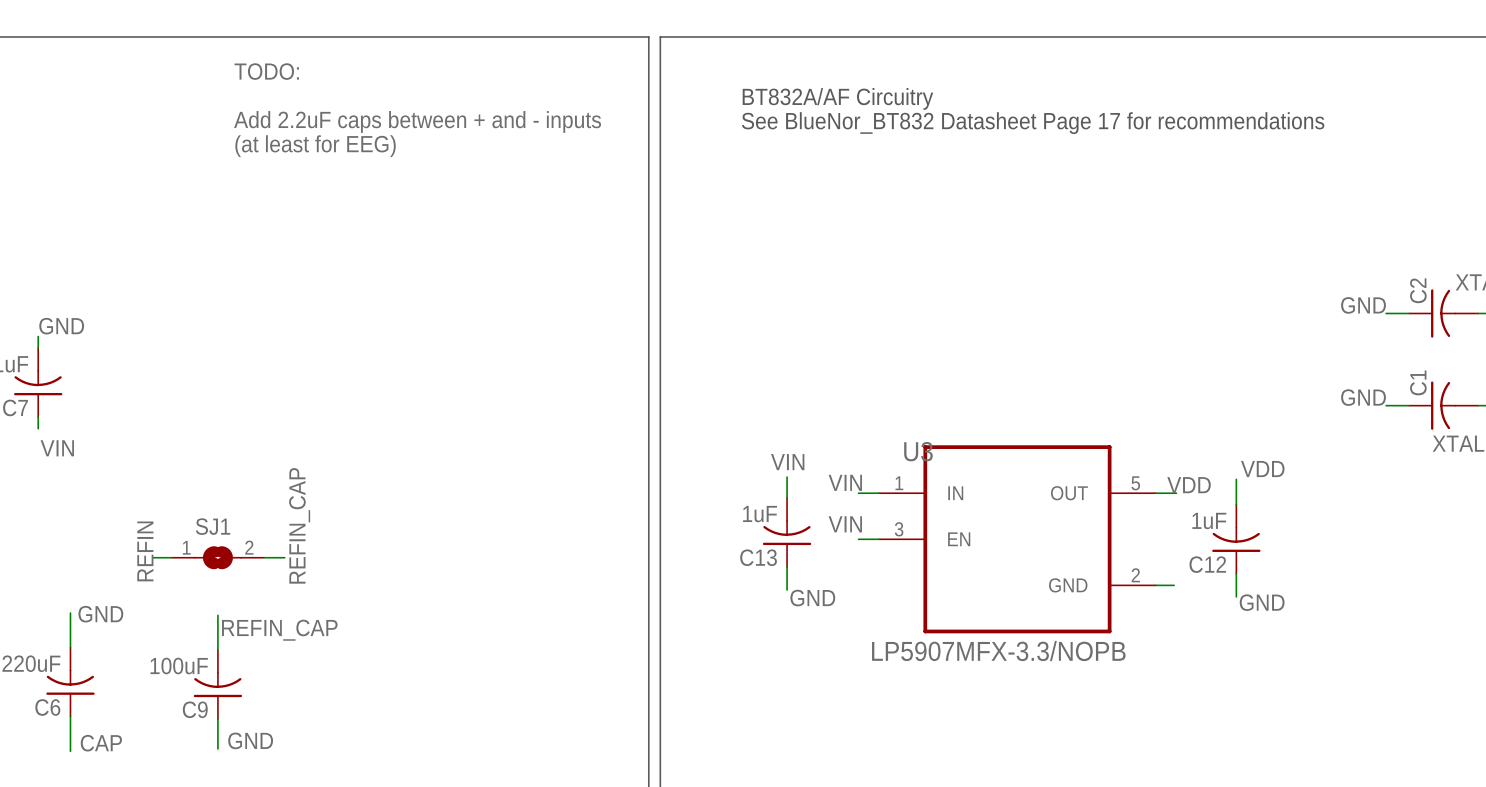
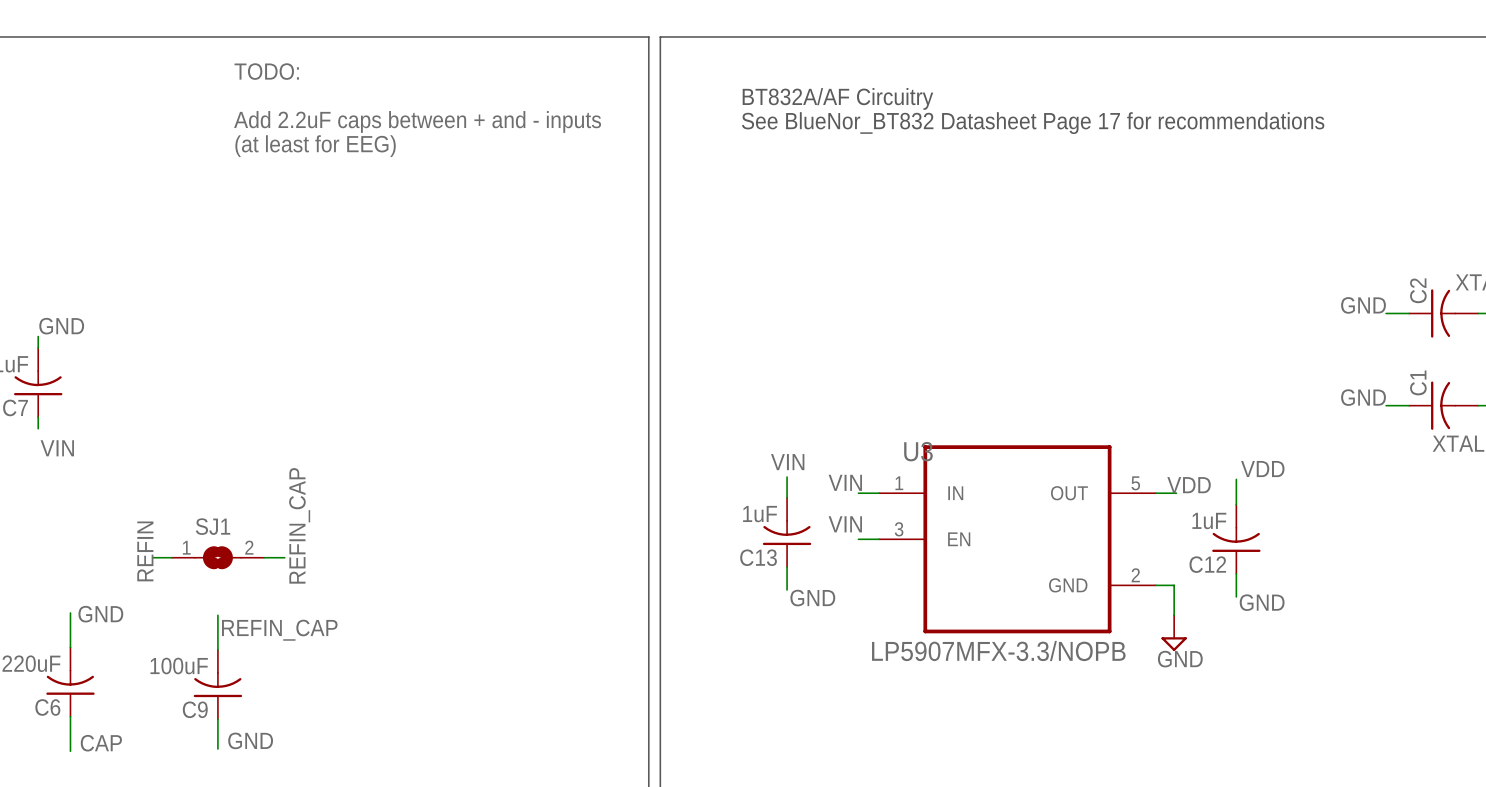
wire: none -> (1174, 585) (1174, 615)
power symbol: none -> GND (1174, 633)

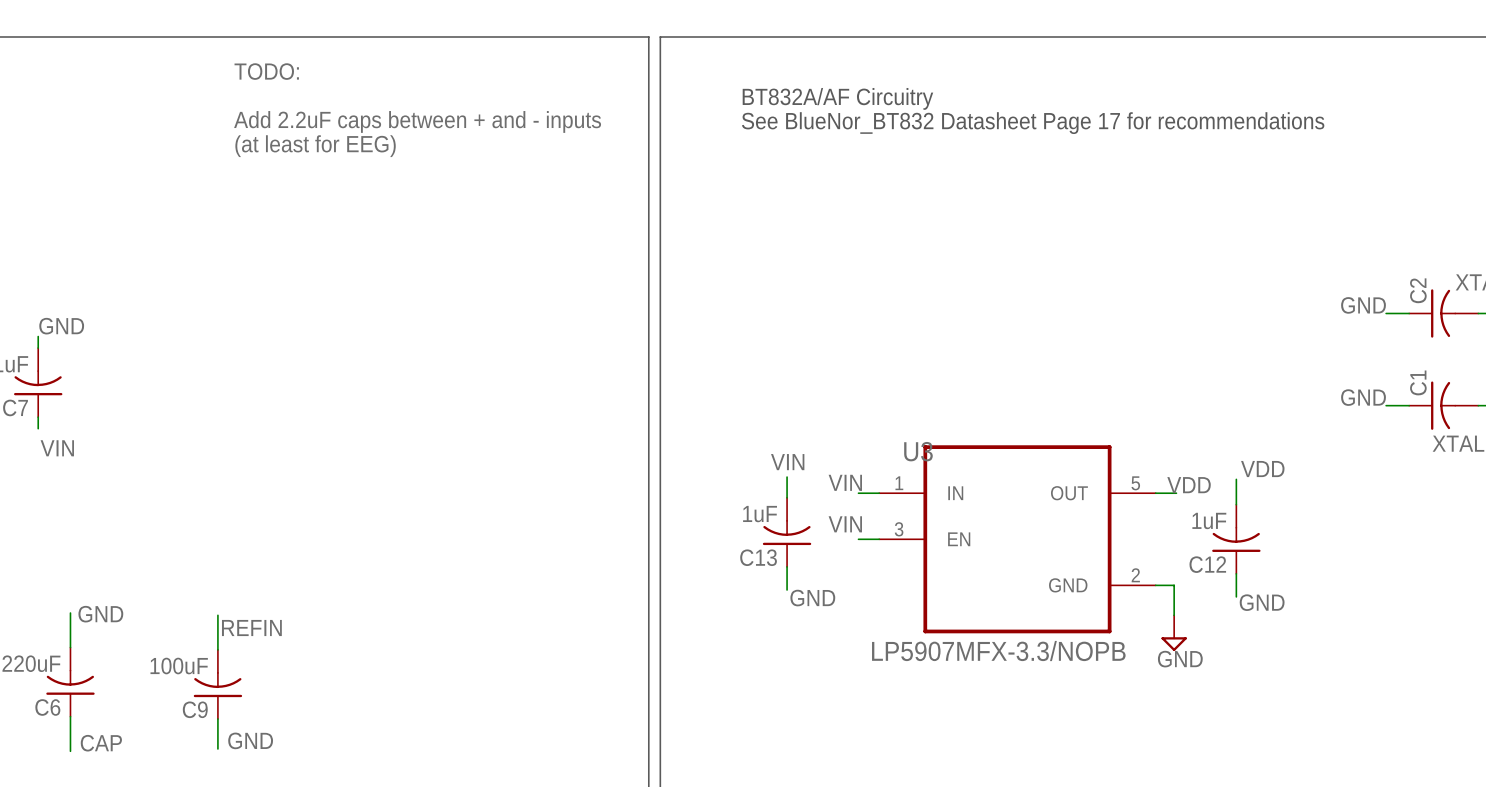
label: REFIN_CAP (299, 525) -> none
label: REFIN (145, 551) -> none
wire: (153, 557) (171, 557) -> none
SJ1: (217, 557) -> none
wire: (264, 557) (284, 557) -> none
label: REFIN_CAP (279, 630) -> REFIN (251, 628)

